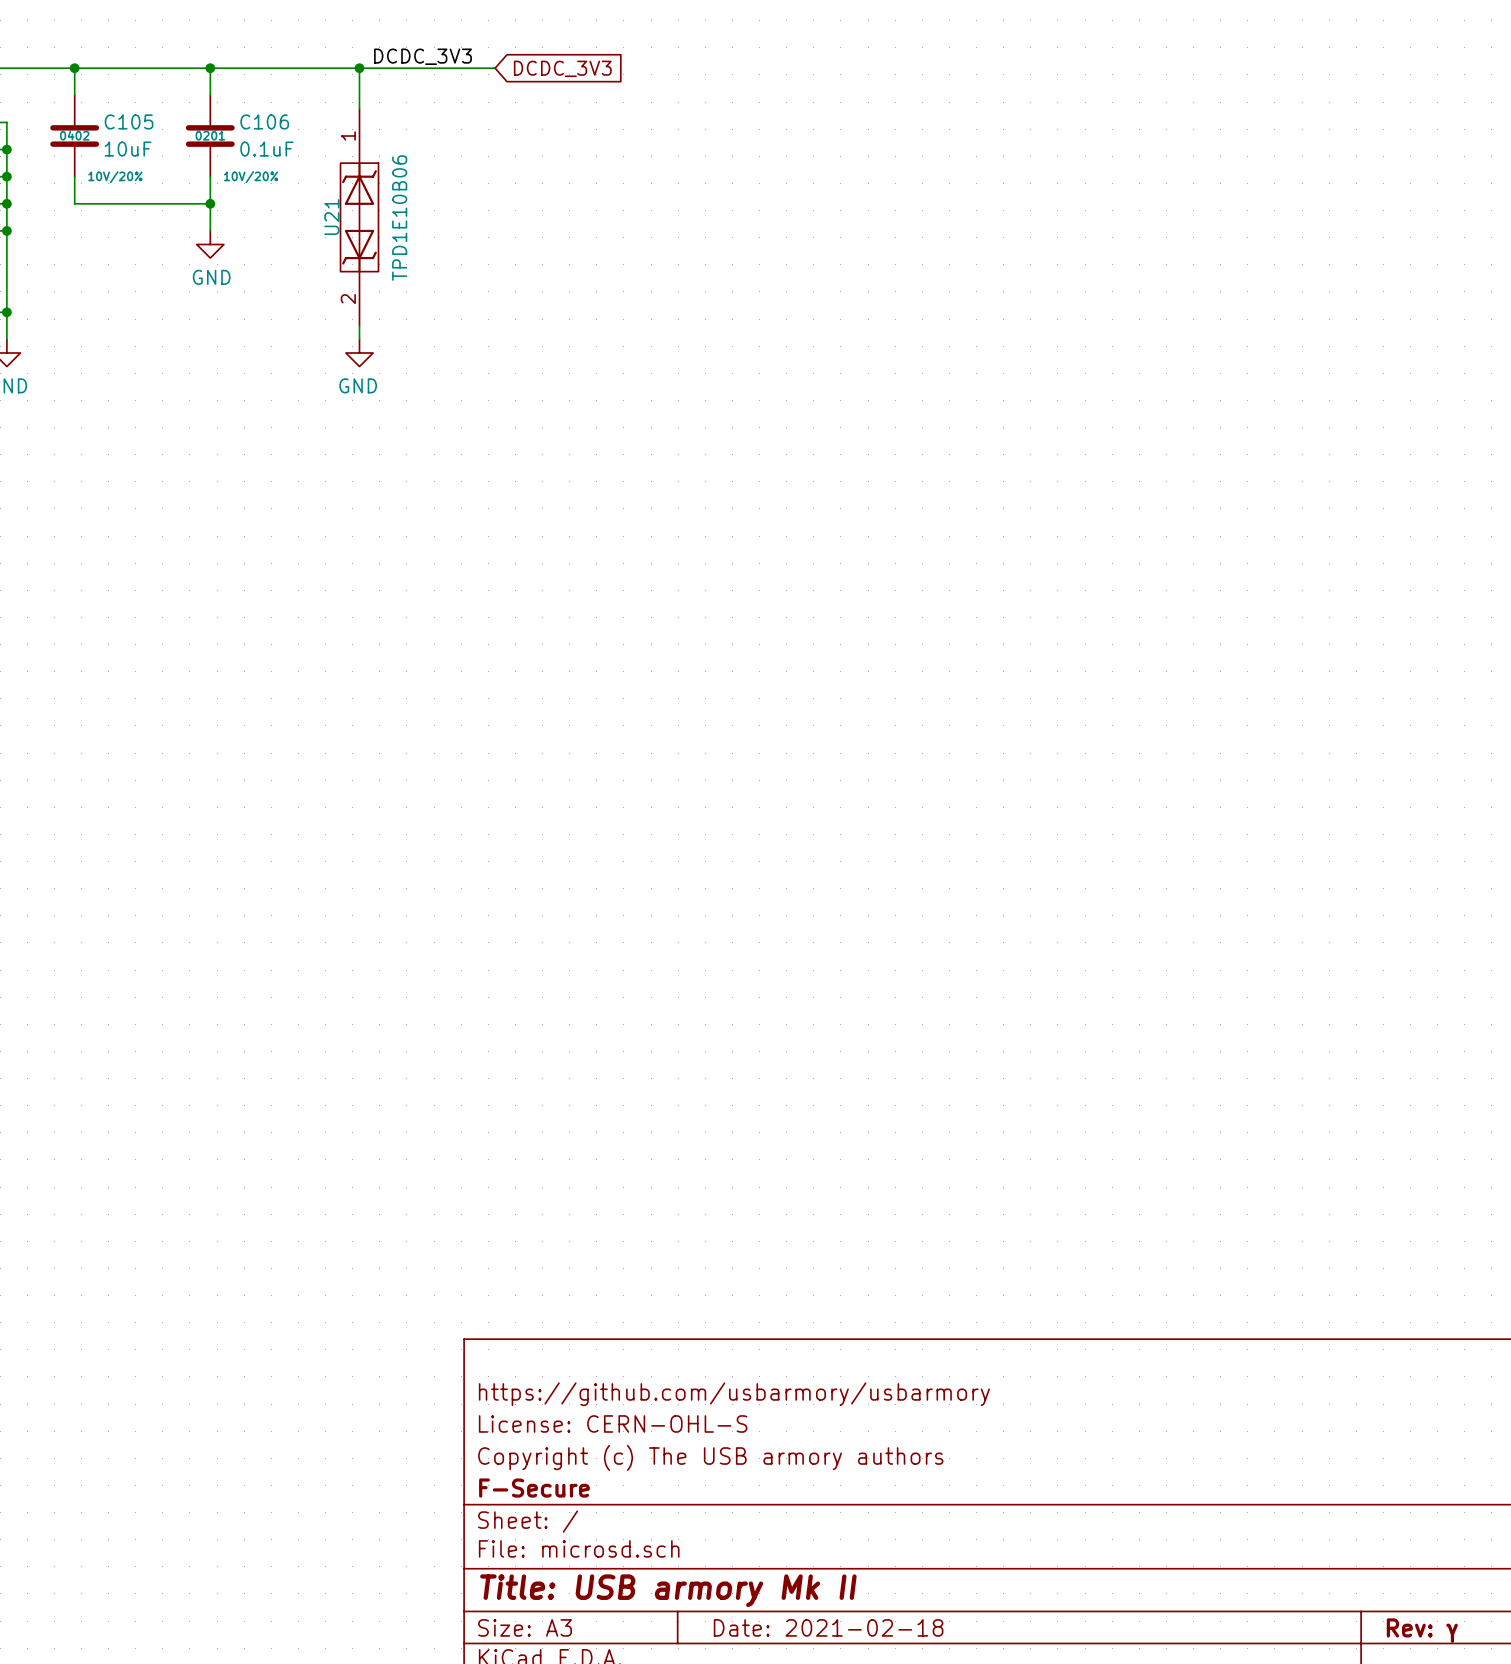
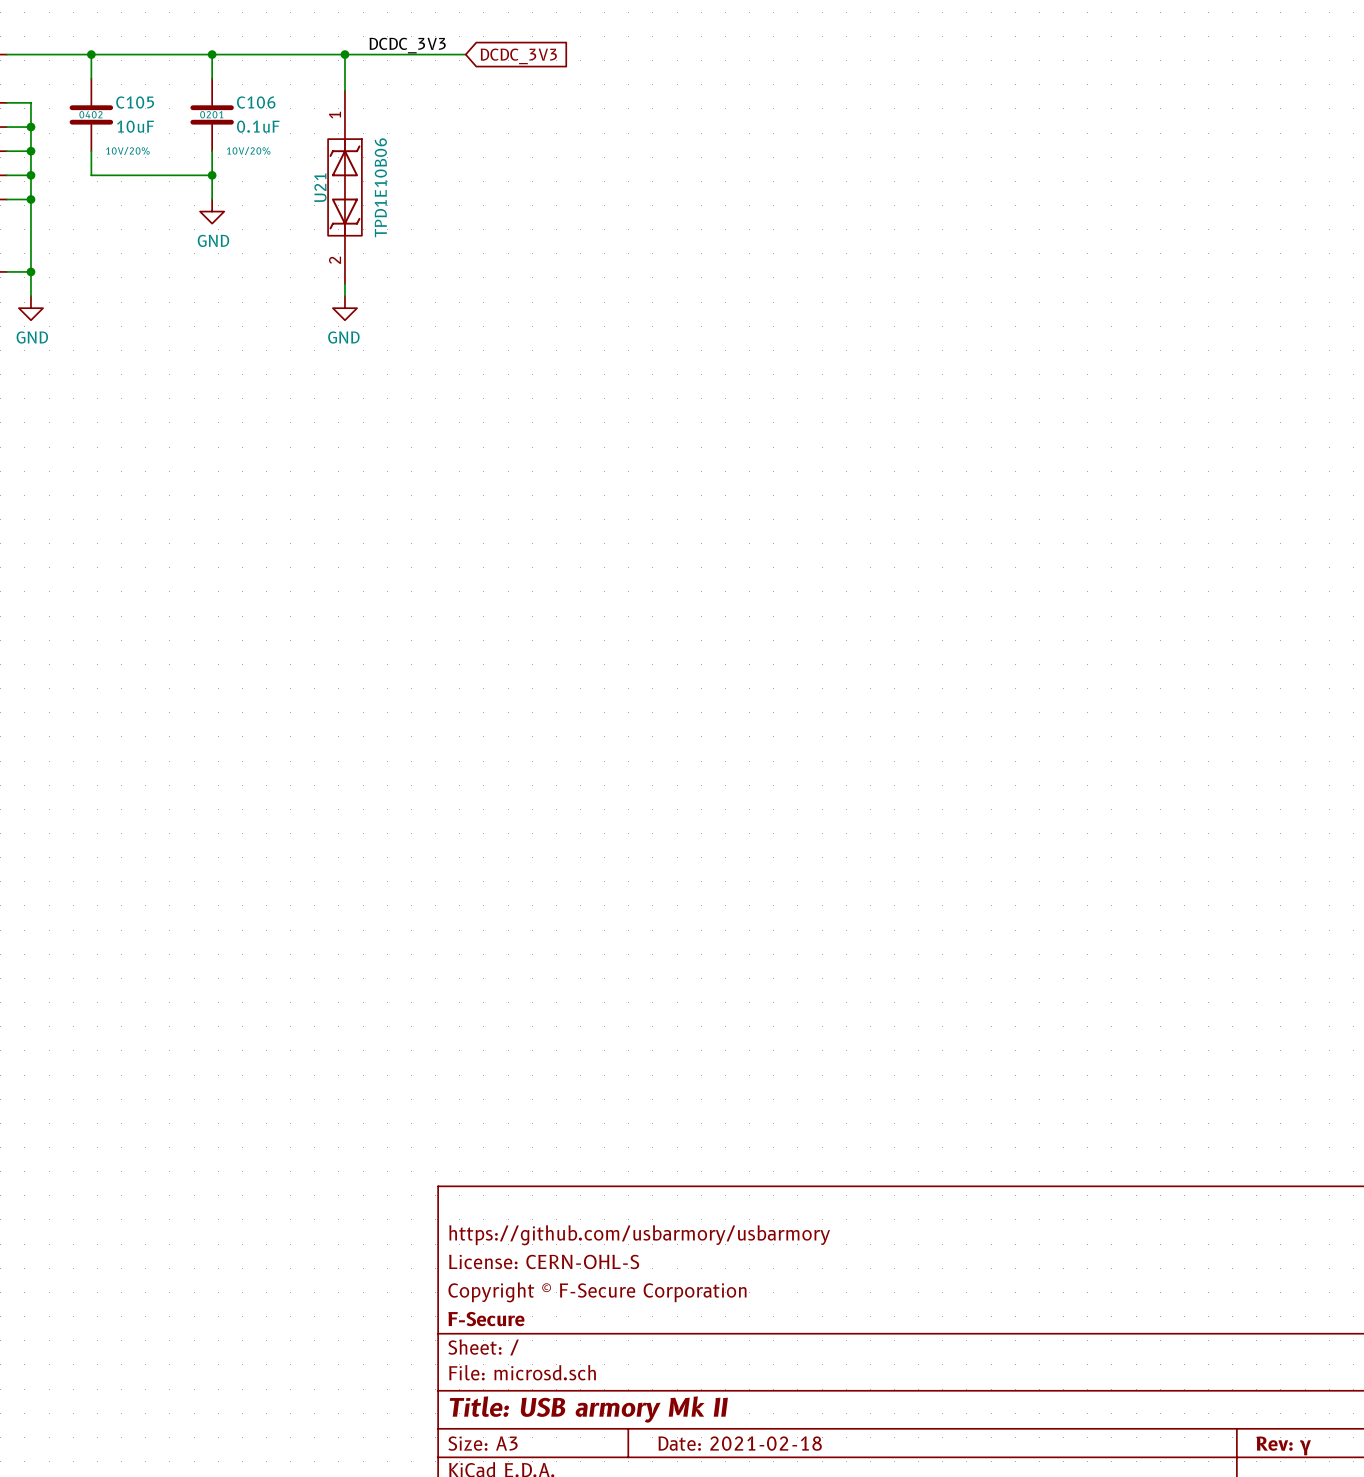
title block: Copyright (c) The USB armory authors (710, 1457) -> Copyright © F-Secure Corporation (597, 1292)

